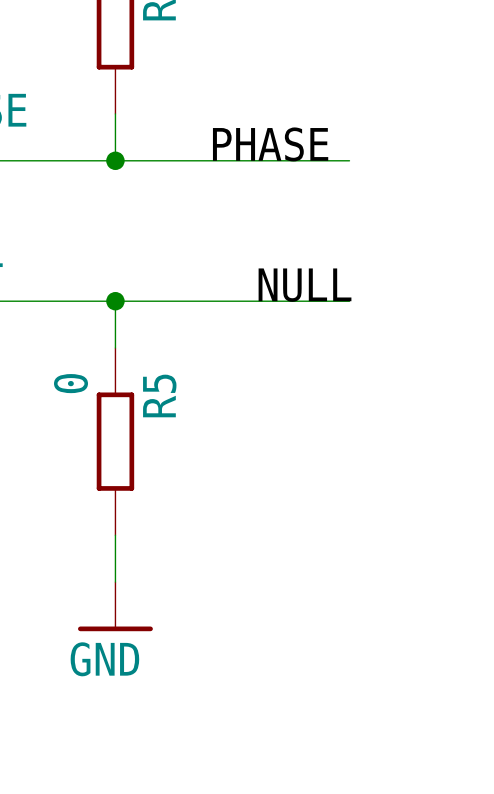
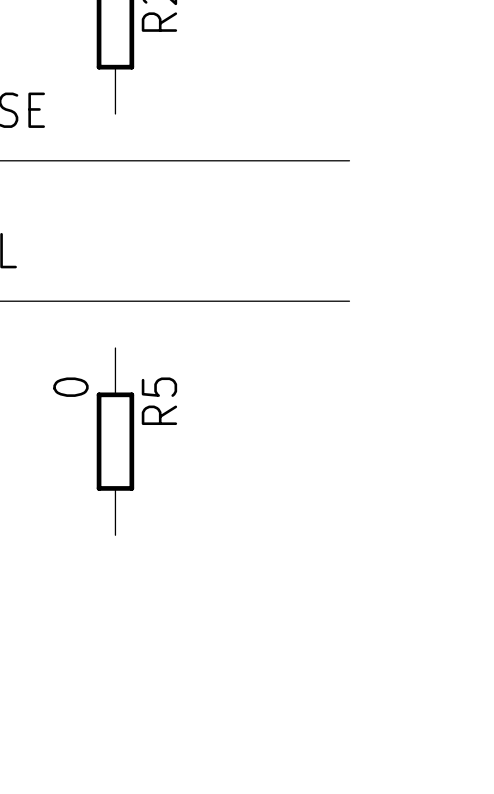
wire: (115, 113) (115, 160) -> none
label: PHASE (270, 144) -> none
junction: (115, 160) -> none
label: NULL (305, 285) -> none
wire: (115, 301) (115, 348) -> none
junction: (115, 301) -> none
wire: (115, 535) (115, 582) -> none
power symbol: GND (115, 606) -> none

